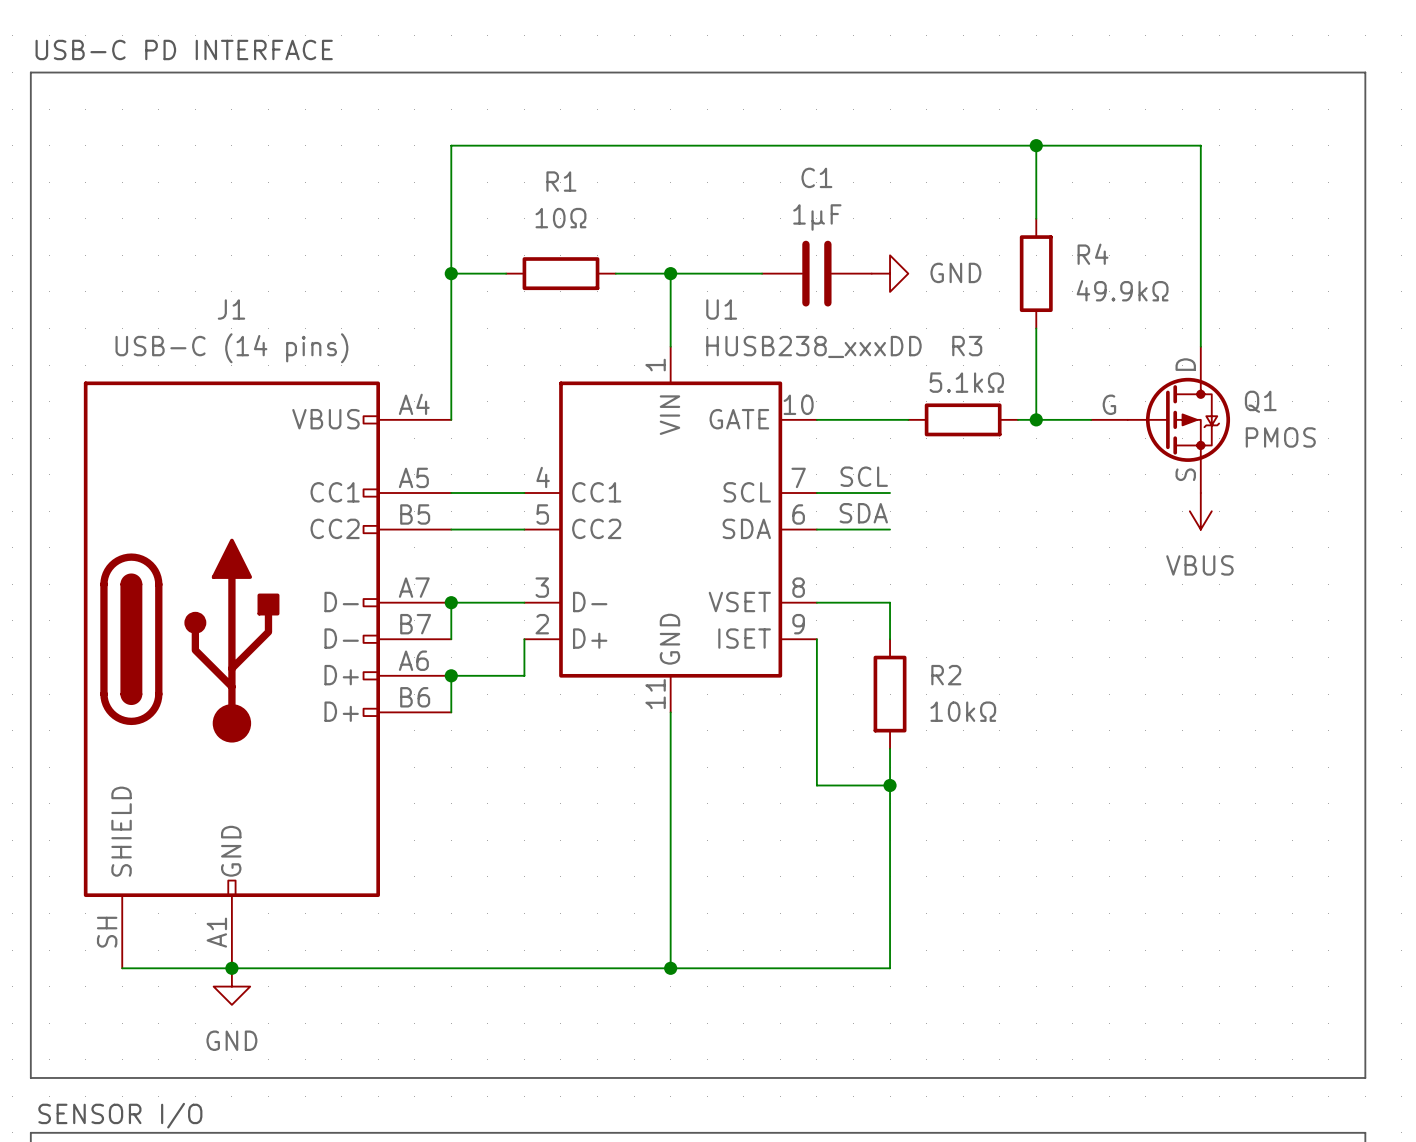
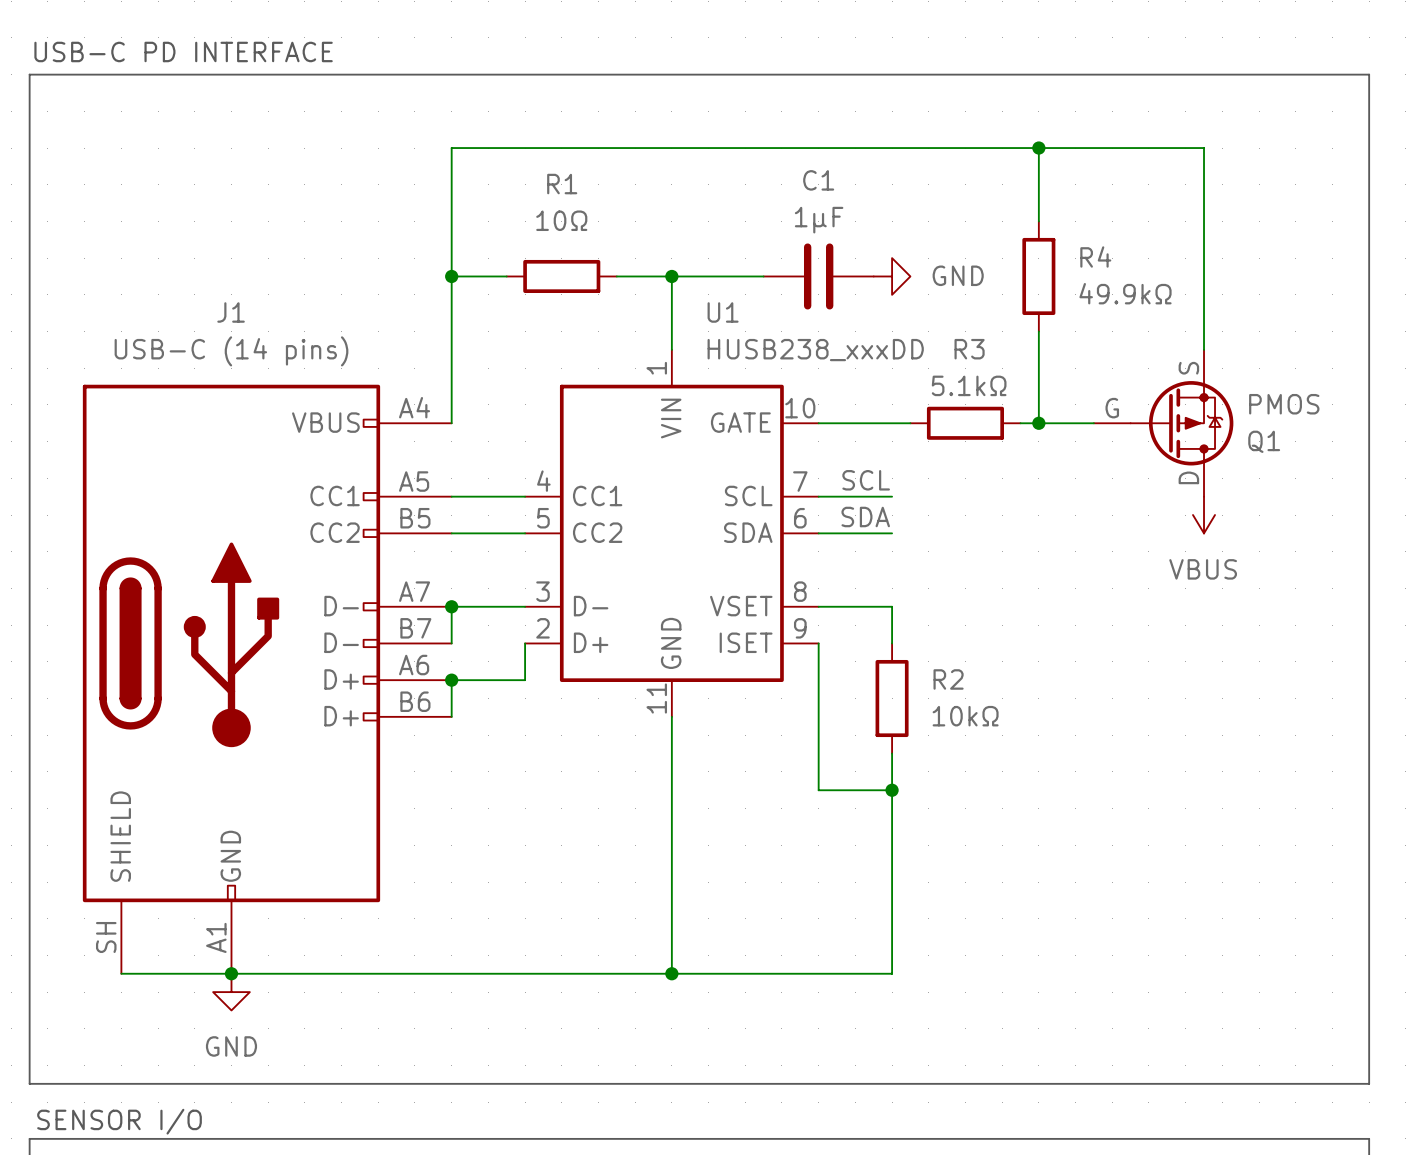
Q1 flip: as is (1178, 419) -> up-down (1181, 423)

